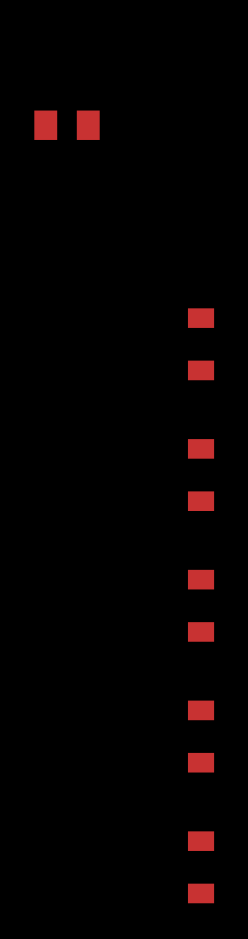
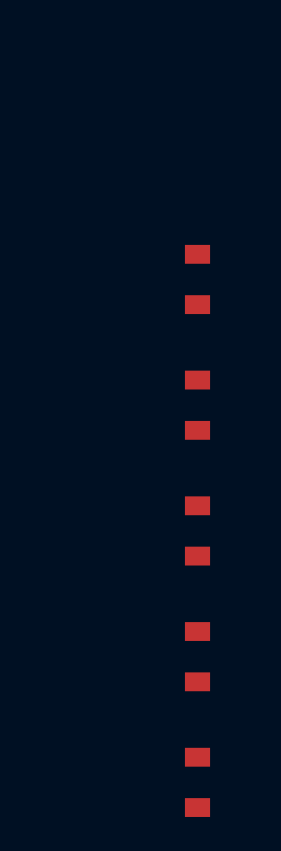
part: (67, 125) -> none

